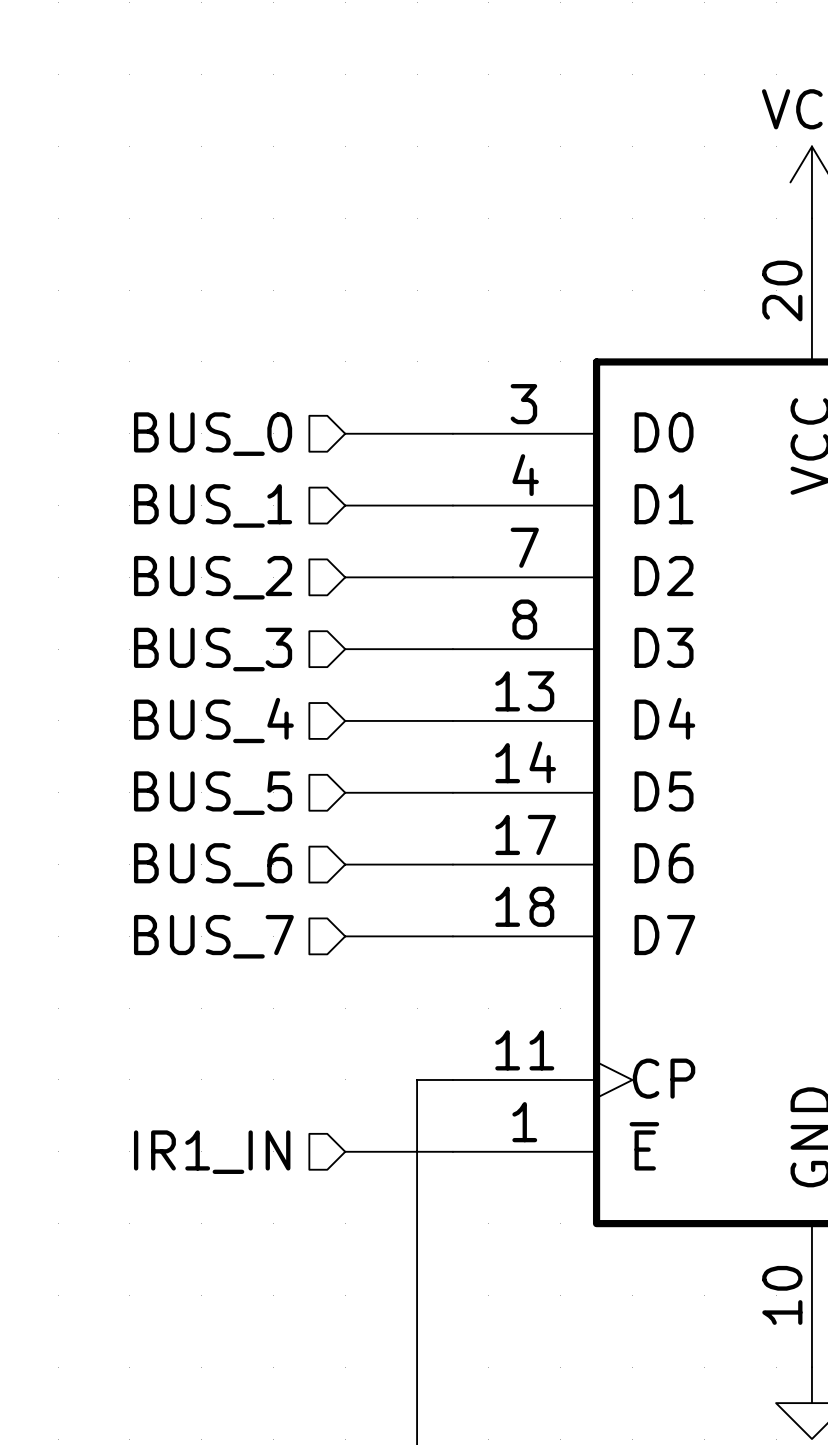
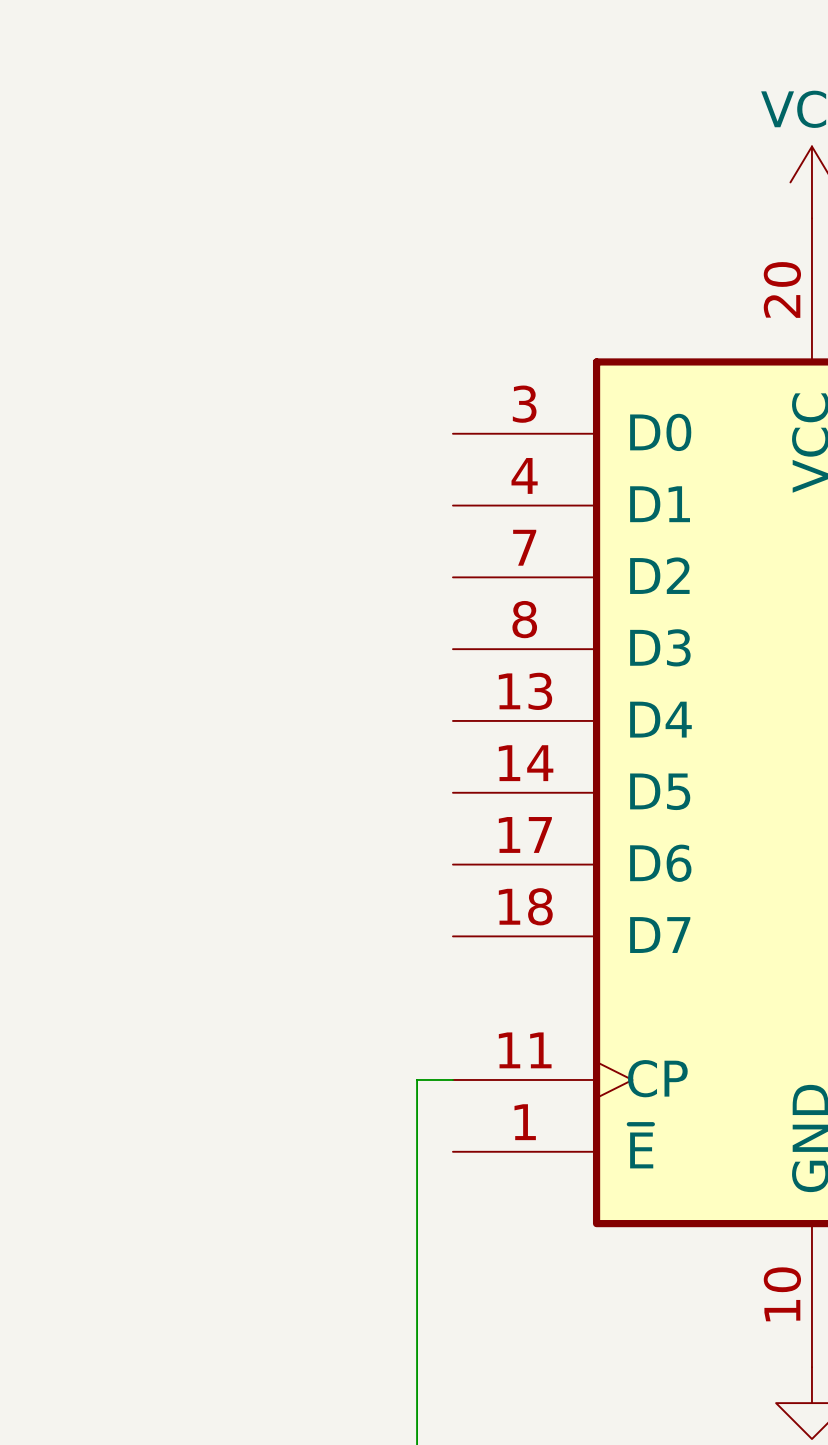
wire: (345, 433) (452, 433) -> none
hierarchical label: BUS_0 (213, 434) -> none
hierarchical label: BUS_1 (213, 505) -> none
wire: (345, 505) (452, 505) -> none
hierarchical label: BUS_2 (213, 577) -> none
wire: (345, 577) (452, 577) -> none
hierarchical label: BUS_3 (213, 649) -> none
wire: (345, 649) (452, 649) -> none
hierarchical label: BUS_4 (213, 720) -> none
wire: (345, 720) (452, 720) -> none
wire: (345, 792) (452, 792) -> none
hierarchical label: BUS_5 (213, 793) -> none
hierarchical label: BUS_6 (213, 864) -> none
wire: (345, 864) (452, 864) -> none
hierarchical label: BUS_7 (213, 936) -> none
wire: (345, 936) (452, 936) -> none
wire: (345, 1151) (452, 1151) -> none
hierarchical label: IR1_IN (212, 1152) -> none

